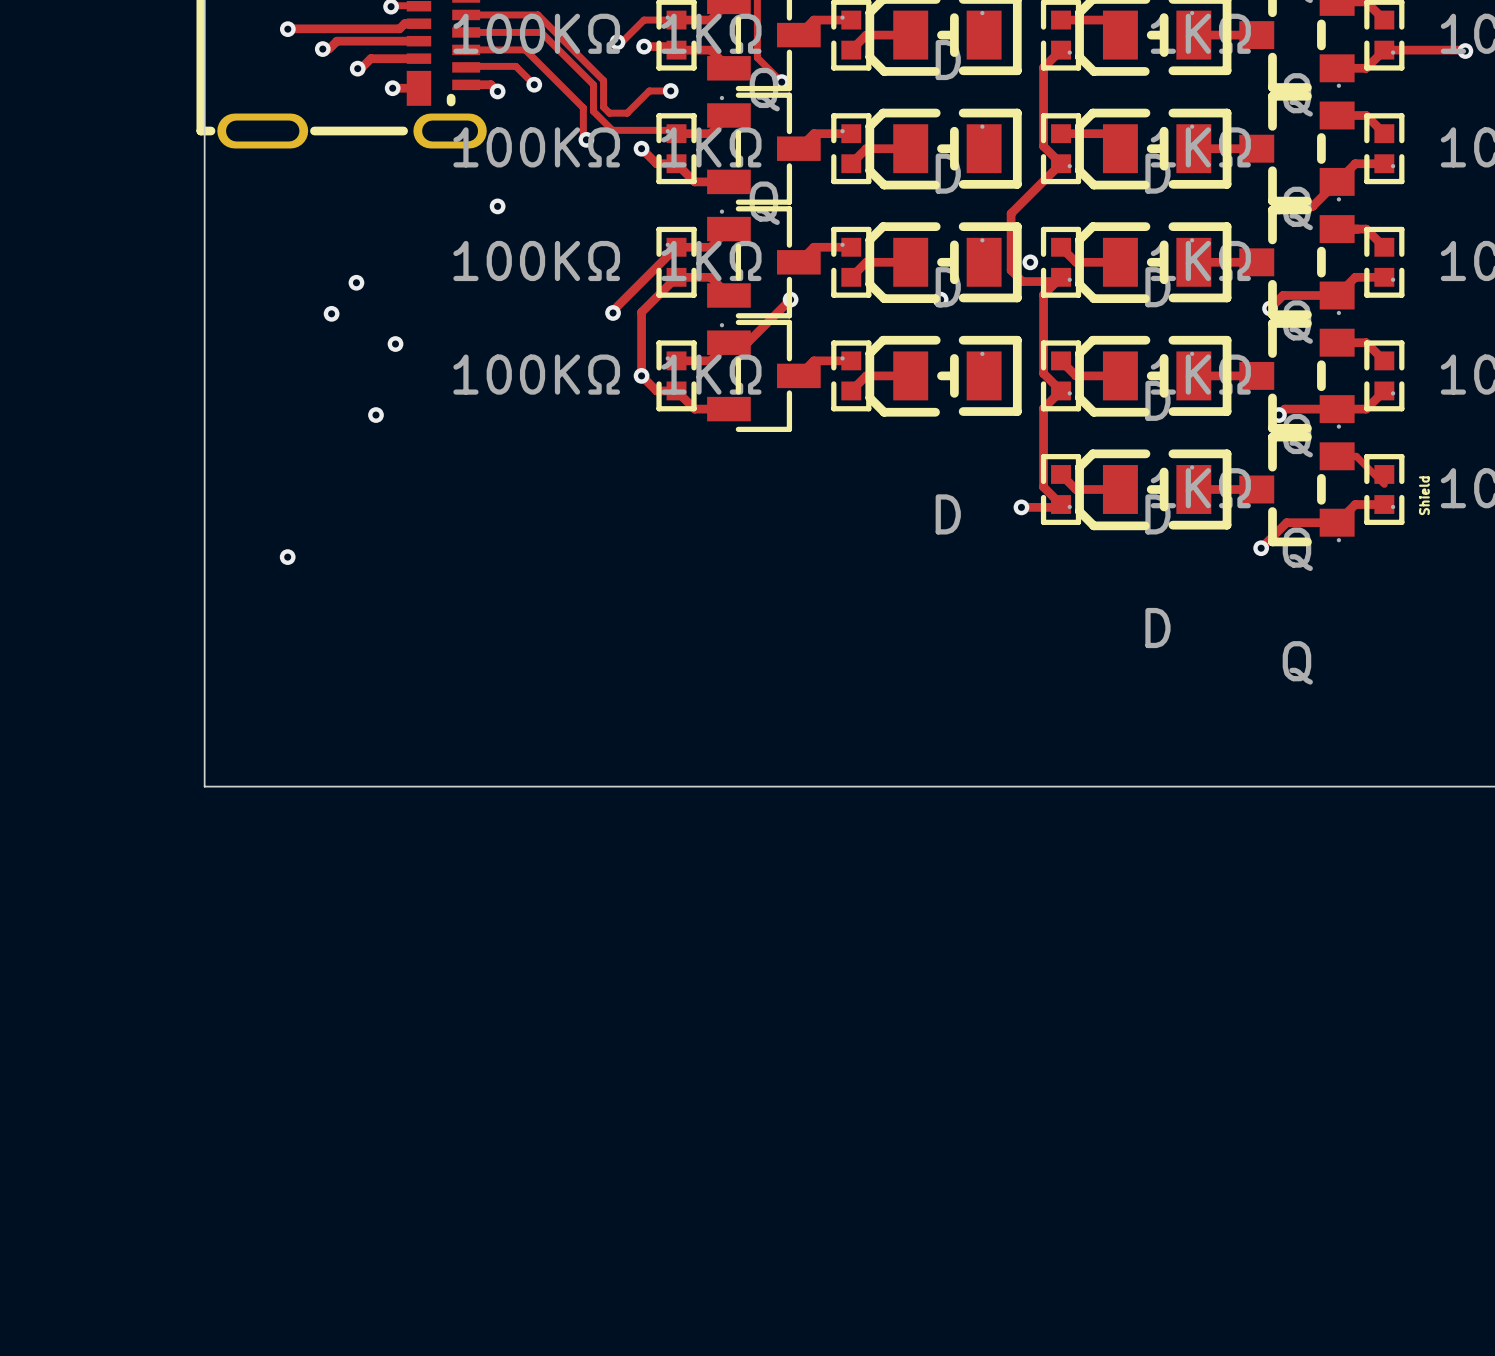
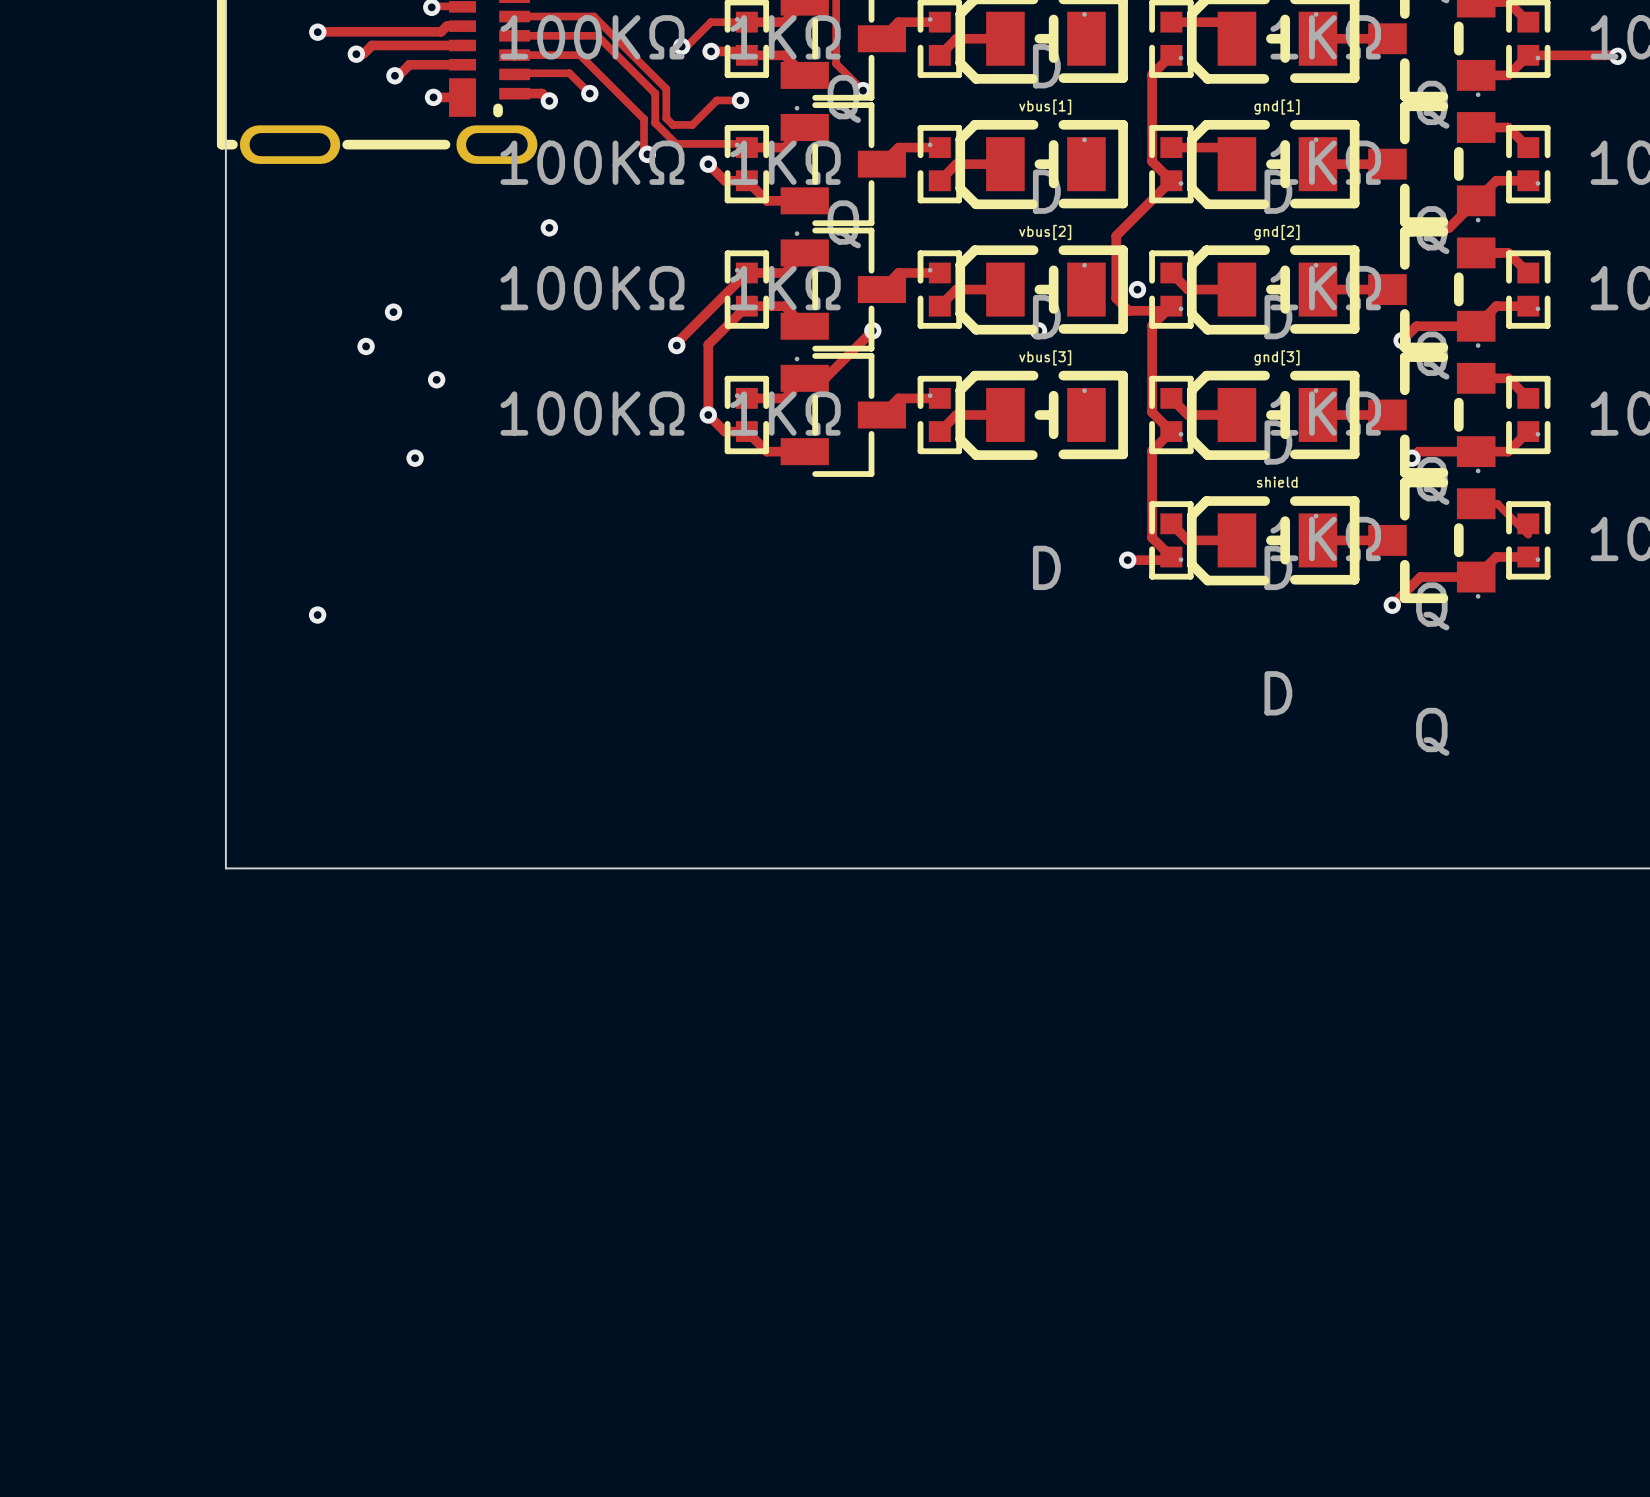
text: none -> vbus[1] (1045, 107)
text: none -> gnd[1] (1277, 107)
text: none -> vbus[2] (1045, 232)
text: none -> gnd[2] (1277, 232)
text: none -> vbus[3] (1045, 357)
text: none -> gnd[3] (1277, 357)
text: none -> shield (1277, 482)
text: Shield (1424, 495) -> none

